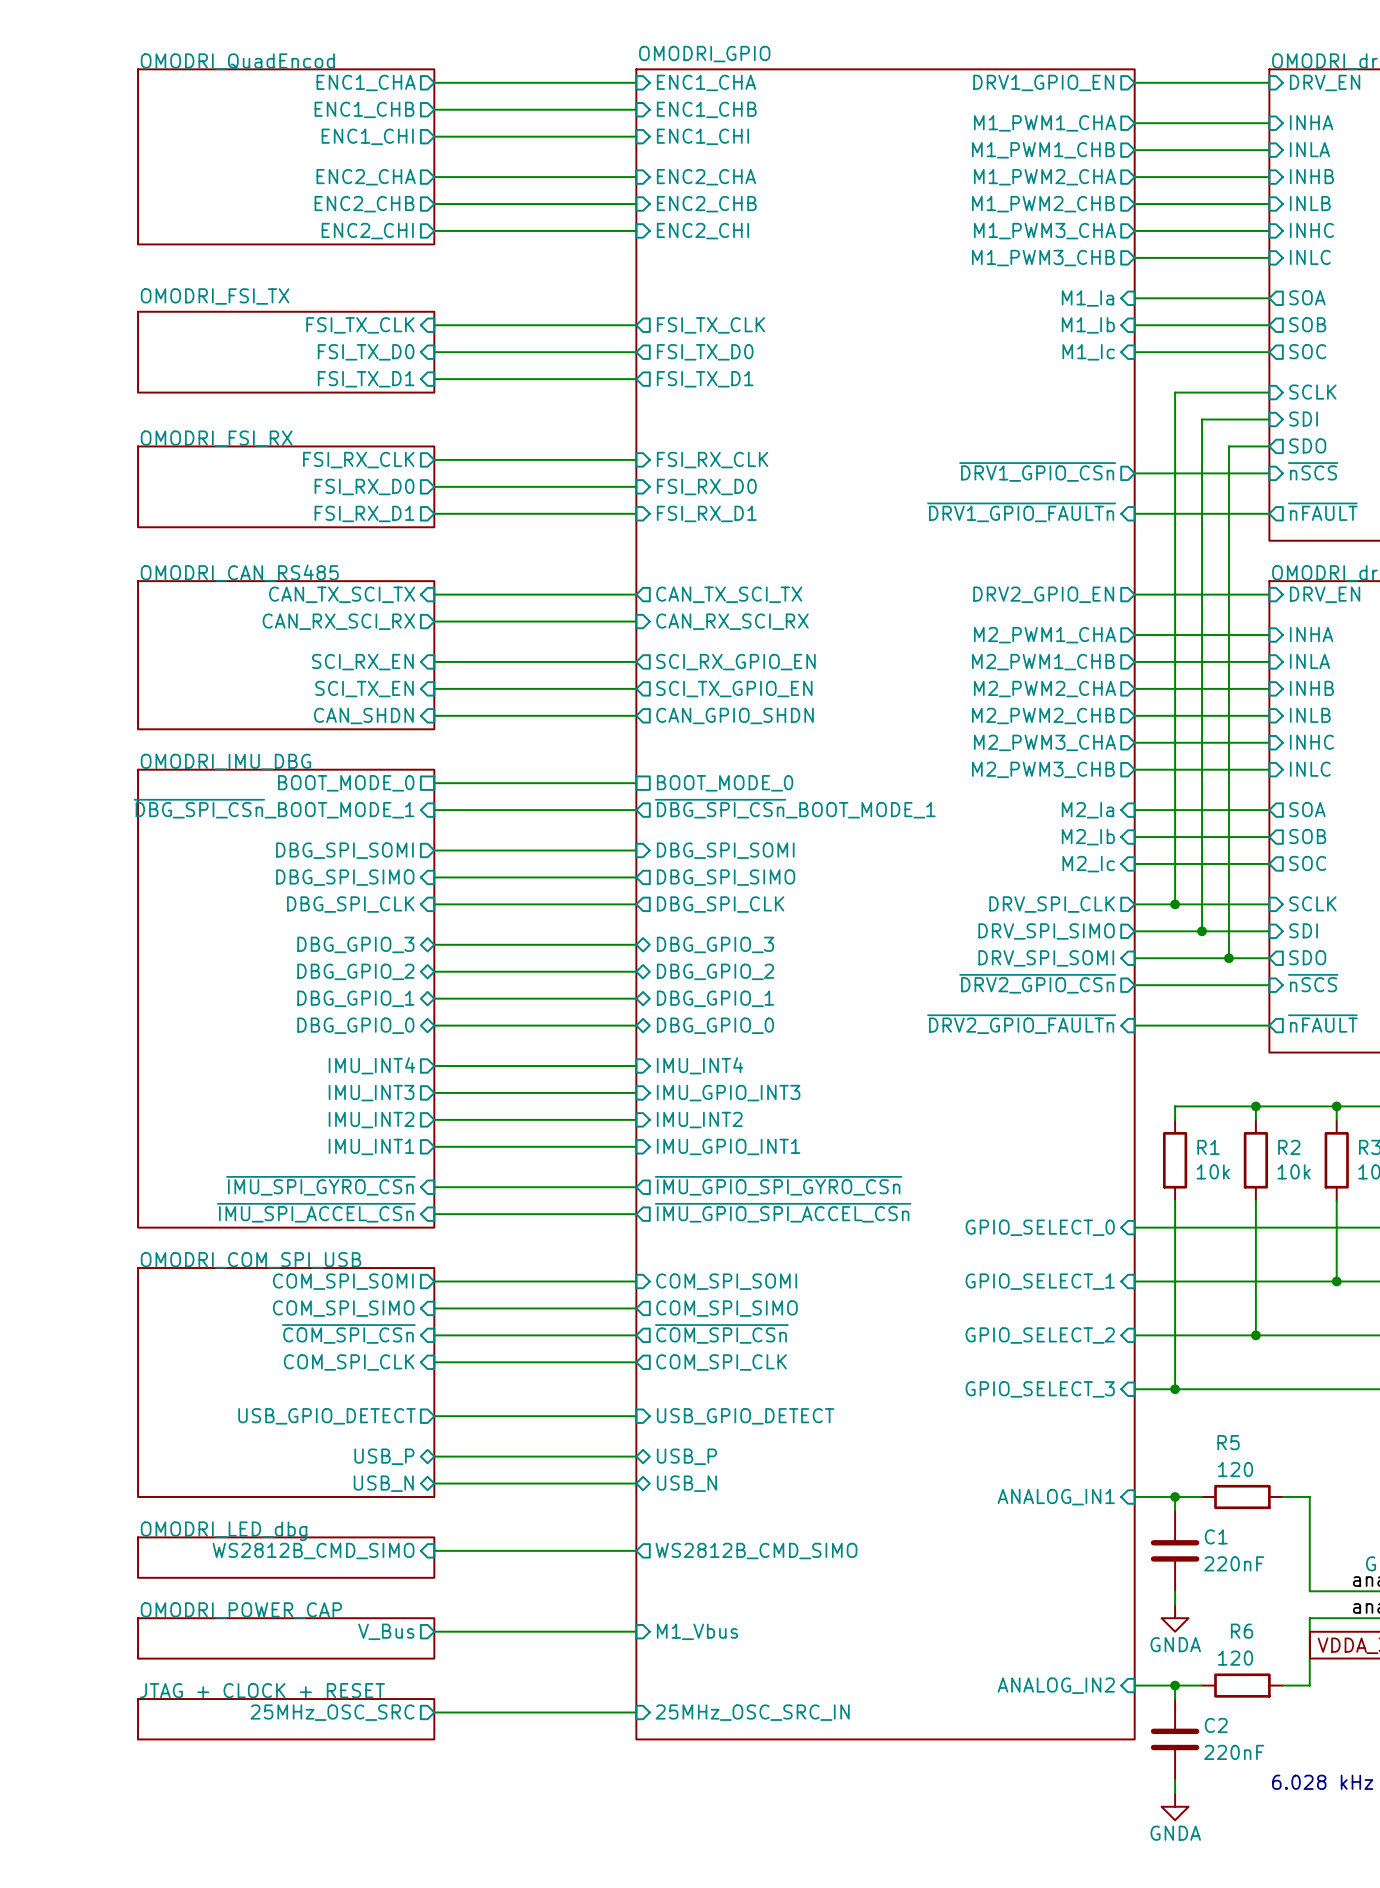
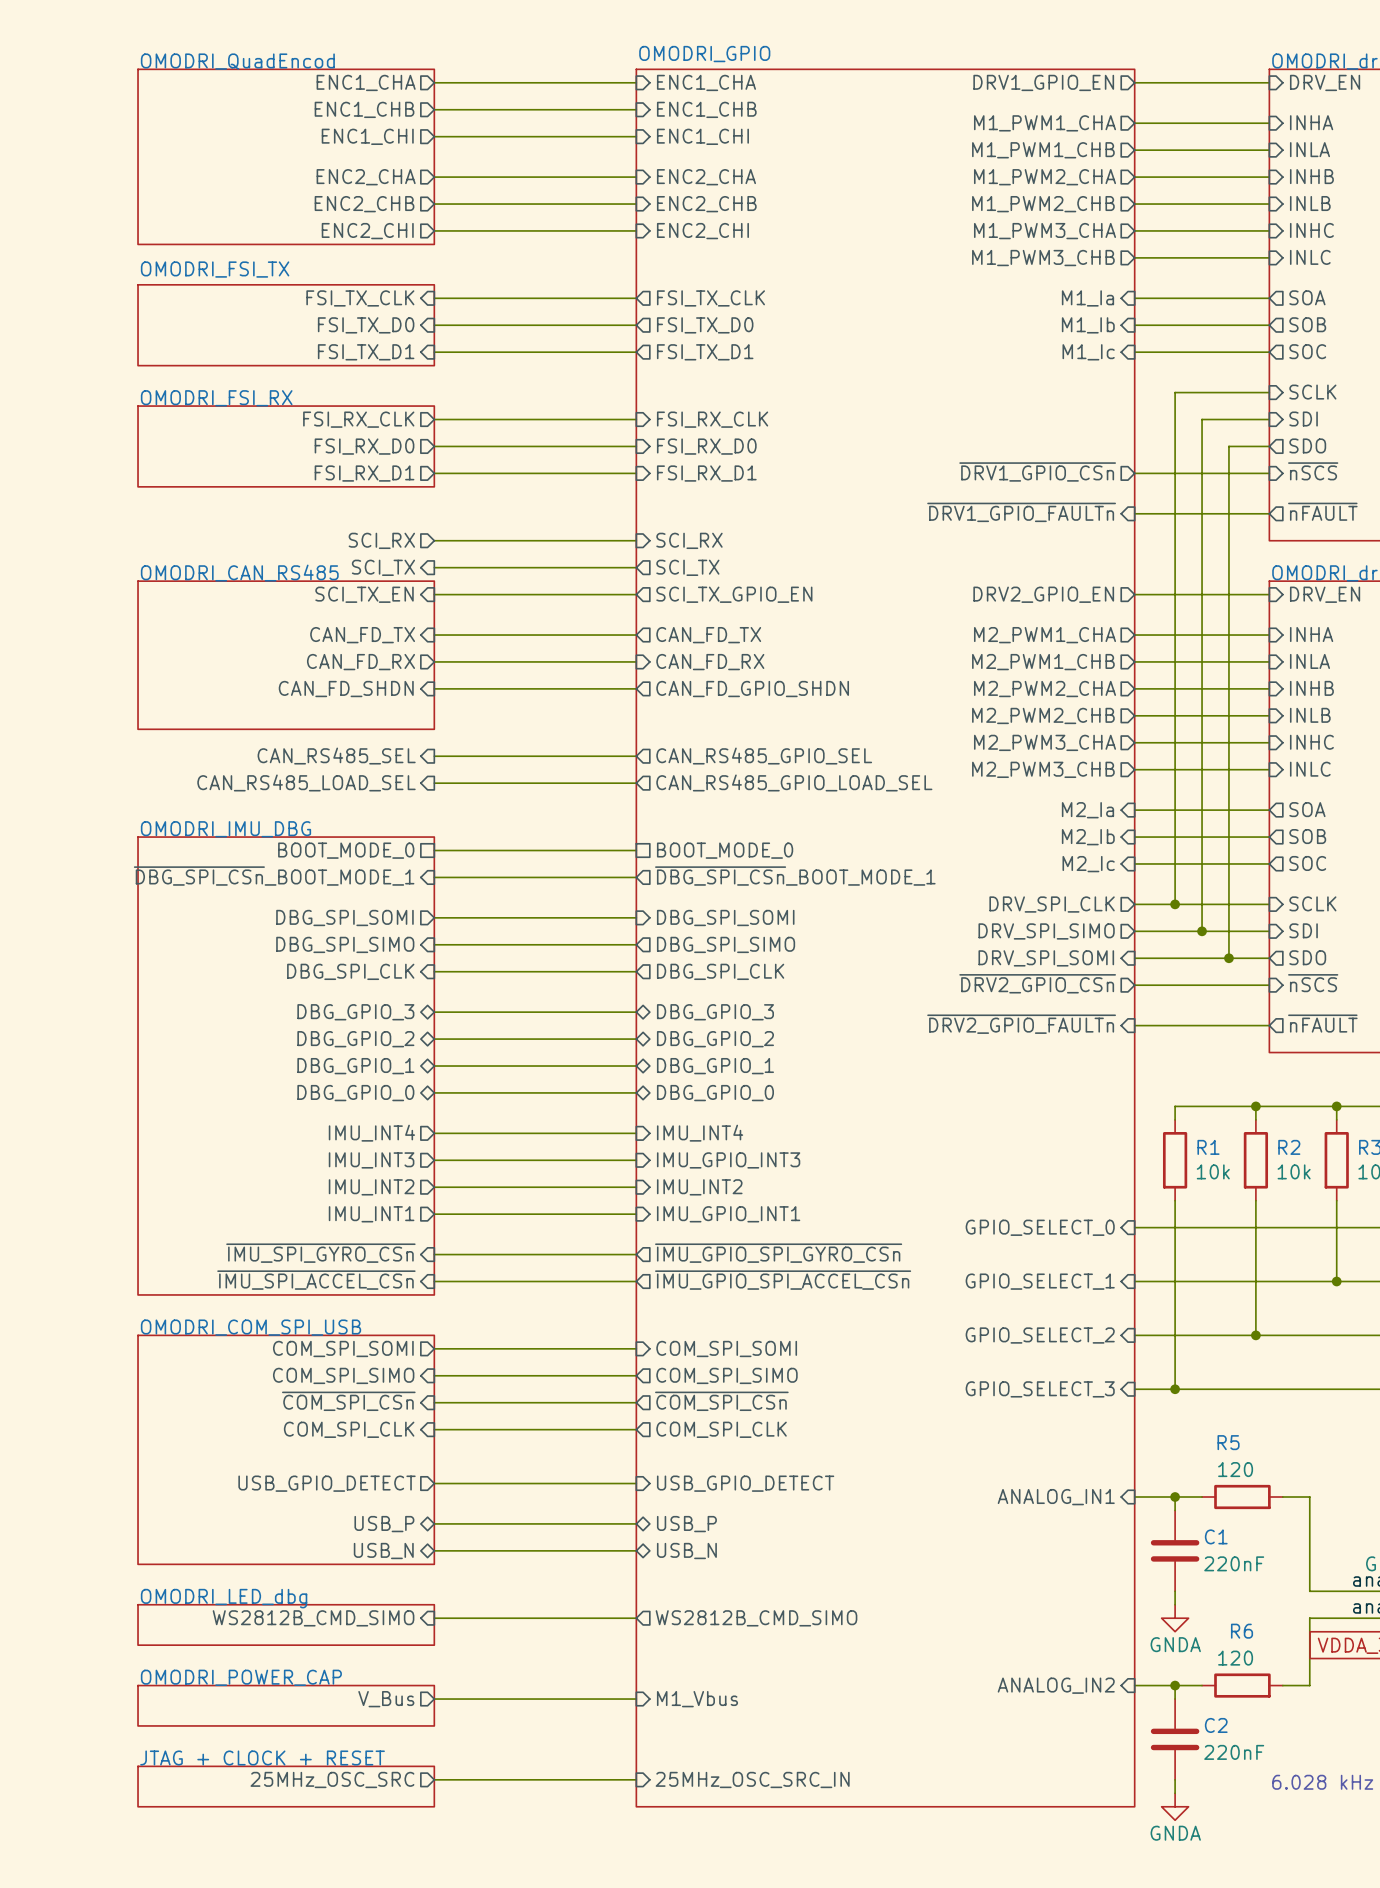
sheet pin: none -> FSI_TX_CLK (360, 298)
wire: none -> (434, 298) (636, 298)
sheet pin: none -> FSI_TX_CLK (710, 298)
sheet pin: FSI_TX_CLK (360, 325) -> FSI_TX_D0 (366, 325)
sheet pin: FSI_TX_CLK (710, 325) -> FSI_TX_D0 (705, 325)
sheet OMODRI_FSI_TX position: (286, 352) -> (286, 325)
sheet pin: FSI_TX_D0 (366, 352) -> FSI_TX_D1 (366, 352)
sheet pin: FSI_TX_D0 (705, 352) -> FSI_TX_D1 (705, 352)
sheet pin: FSI_TX_D1 (366, 379) -> none
wire: (434, 379) (636, 379) -> (434, 419) (636, 419)
sheet pin: FSI_TX_D1 (705, 379) -> none
wire: (434, 459) (636, 459) -> (434, 473) (636, 473)
sheet pin position: FSI_RX_CLK (358, 460) -> FSI_RX_CLK (358, 419)
sheet pin position: FSI_RX_CLK (712, 460) -> FSI_RX_CLK (712, 419)
sheet OMODRI_FSI_RX position: (286, 486) -> (286, 446)
wire: (434, 486) (636, 486) -> (434, 446) (636, 446)
sheet pin position: FSI_RX_D0 (364, 487) -> FSI_RX_D0 (364, 446)
sheet pin position: FSI_RX_D0 (706, 487) -> FSI_RX_D0 (706, 446)
sheet pin position: FSI_RX_D1 (364, 513) -> FSI_RX_D1 (364, 473)
wire: (434, 513) (636, 513) -> (434, 540) (636, 540)
sheet pin position: FSI_RX_D1 (706, 513) -> FSI_RX_D1 (706, 473)
sheet pin: none -> SCI_RX (381, 540)
sheet pin: none -> SCI_RX (689, 540)
sheet pin: none -> SCI_TX (383, 567)
sheet pin: none -> SCI_TX (687, 567)
sheet pin: CAN_TX_SCI_TX (342, 594) -> SCI_TX_EN (364, 594)
sheet pin: CAN_TX_SCI_TX (729, 594) -> SCI_TX_GPIO_EN (734, 594)
sheet pin: CAN_RX_SCI_RX (338, 621) -> none
wire: (434, 621) (636, 621) -> (434, 635) (636, 635)
sheet pin: CAN_RX_SCI_RX (732, 621) -> none
sheet pin: none -> CAN_FD_TX (362, 635)
sheet pin: none -> CAN_FD_TX (708, 635)
sheet pin shape: input (362, 662) -> output (361, 662)
sheet pin: SCI_RX_EN (362, 662) -> CAN_FD_RX (361, 662)
sheet pin shape: output (735, 662) -> input (710, 662)
sheet pin: SCI_RX_GPIO_EN (735, 662) -> CAN_FD_RX (710, 662)
sheet pin: SCI_TX_EN (364, 689) -> CAN_FD_SHDN (346, 689)
sheet pin: SCI_TX_GPIO_EN (734, 689) -> CAN_FD_GPIO_SHDN (752, 689)
sheet pin: CAN_SHDN (363, 715) -> none
wire: (434, 715) (636, 715) -> (434, 756) (636, 756)
sheet pin: CAN_GPIO_SHDN (735, 715) -> none
sheet pin: none -> CAN_RS485_SEL (336, 756)
sheet pin: none -> CAN_RS485_GPIO_SEL (764, 756)
sheet pin shape: passive (346, 783) -> input (306, 782)
sheet pin: BOOT_MODE_0 (346, 783) -> CAN_RS485_LOAD_SEL (306, 782)
sheet pin shape: passive (725, 783) -> output (794, 782)
sheet pin: BOOT_MODE_0 (725, 783) -> CAN_RS485_GPIO_LOAD_SEL (794, 782)
sheet pin: ~{DBG_SPI_CSn}_BOOT_MODE_1 (274, 808) -> none
sheet pin: ~{DBG_SPI_CSn}_BOOT_MODE_1 (795, 808) -> none
wire: (434, 810) (636, 810) -> (434, 567) (636, 567)
sheet pin shape: output (344, 850) -> passive (346, 850)
sheet pin: DBG_SPI_SOMI (344, 850) -> BOOT_MODE_0 (346, 850)
sheet pin shape: input (725, 850) -> passive (725, 850)
sheet pin: DBG_SPI_SOMI (725, 850) -> BOOT_MODE_0 (725, 850)
sheet pin: DBG_SPI_SIMO (345, 877) -> ~{DBG_SPI_CSn}_BOOT_MODE_1 (274, 876)
sheet pin: DBG_SPI_SIMO (726, 877) -> ~{DBG_SPI_CSn}_BOOT_MODE_1 (795, 876)
sheet pin shape: input (350, 904) -> output (344, 917)
sheet pin: DBG_SPI_CLK (350, 904) -> DBG_SPI_SOMI (344, 917)
wire: (434, 904) (636, 904) -> (434, 917) (636, 917)
sheet pin shape: output (720, 904) -> input (725, 917)
sheet pin: DBG_SPI_CLK (720, 904) -> DBG_SPI_SOMI (725, 917)
sheet OMODRI_GPIO: (885, 904) -> none
sheet OMODRI_GPIO: none -> (885, 938)
sheet pin shape: bidirectional (355, 944) -> input (345, 944)
sheet pin: DBG_GPIO_3 (355, 944) -> DBG_SPI_SIMO (345, 944)
sheet pin shape: bidirectional (715, 944) -> output (726, 944)
sheet pin: DBG_GPIO_3 (715, 944) -> DBG_SPI_SIMO (726, 944)
sheet pin shape: bidirectional (355, 971) -> input (350, 971)
sheet pin: DBG_GPIO_2 (355, 971) -> DBG_SPI_CLK (350, 971)
sheet pin shape: bidirectional (715, 971) -> output (720, 971)
sheet pin: DBG_GPIO_2 (715, 971) -> DBG_SPI_CLK (720, 971)
sheet OMODRI_IMU_DBG position: (286, 998) -> (286, 1066)
sheet pin: DBG_GPIO_1 (355, 998) -> none
wire: (434, 998) (636, 998) -> (434, 1012) (636, 1012)
sheet pin: DBG_GPIO_1 (715, 998) -> none
sheet pin: none -> DBG_GPIO_3 (355, 1012)
sheet pin: none -> DBG_GPIO_3 (715, 1012)
sheet pin: DBG_GPIO_0 (355, 1025) -> none
wire: (434, 1025) (636, 1025) -> (434, 1039) (636, 1039)
sheet pin: DBG_GPIO_0 (715, 1025) -> none
sheet pin: none -> DBG_GPIO_2 (355, 1039)
sheet pin: none -> DBG_GPIO_2 (715, 1039)
sheet pin shape: output (371, 1065) -> bidirectional (355, 1066)
sheet pin: IMU_INT4 (371, 1065) -> DBG_GPIO_1 (355, 1066)
sheet pin shape: input (700, 1065) -> bidirectional (715, 1066)
sheet pin: IMU_INT4 (700, 1065) -> DBG_GPIO_1 (715, 1066)
sheet pin shape: output (371, 1093) -> bidirectional (355, 1093)
sheet pin: IMU_INT3 (371, 1093) -> DBG_GPIO_0 (355, 1093)
sheet pin shape: input (728, 1093) -> bidirectional (715, 1093)
sheet pin: IMU_GPIO_INT3 (728, 1093) -> DBG_GPIO_0 (715, 1093)
wire: (434, 1119) (636, 1119) -> (434, 1133) (636, 1133)
sheet pin: IMU_INT2 (371, 1120) -> none
sheet pin: IMU_INT2 (699, 1120) -> none
sheet pin: none -> IMU_INT4 (371, 1133)
sheet pin: none -> IMU_INT4 (700, 1133)
sheet pin: IMU_INT1 (371, 1146) -> none
wire: (434, 1146) (636, 1146) -> (434, 1160) (636, 1160)
sheet pin: IMU_GPIO_INT1 (728, 1146) -> none
sheet pin: none -> IMU_INT3 (371, 1160)
sheet pin: none -> IMU_GPIO_INT3 (728, 1160)
sheet pin shape: input (320, 1185) -> output (371, 1187)
sheet pin: ~{IMU_SPI_GYRO_CSn} (320, 1185) -> IMU_INT2 (371, 1187)
sheet pin shape: output (778, 1185) -> input (699, 1187)
sheet pin: ~{IMU_GPIO_SPI_GYRO_CSn} (778, 1185) -> IMU_INT2 (699, 1187)
sheet pin shape: input (316, 1212) -> output (371, 1214)
sheet pin: ~{IMU_SPI_ACCEL_CSn} (316, 1212) -> IMU_INT1 (371, 1214)
sheet pin shape: output (783, 1212) -> input (728, 1214)
sheet pin: ~{IMU_GPIO_SPI_ACCEL_CSn} (783, 1212) -> IMU_GPIO_INT1 (728, 1214)
sheet pin: none -> ~{IMU_SPI_GYRO_CSn} (320, 1253)
sheet pin: none -> ~{IMU_GPIO_SPI_GYRO_CSn} (778, 1253)
sheet pin shape: output (343, 1281) -> input (316, 1280)
sheet pin: COM_SPI_SOMI (343, 1281) -> ~{IMU_SPI_ACCEL_CSn} (316, 1280)
sheet pin shape: input (726, 1281) -> output (783, 1280)
sheet pin: COM_SPI_SOMI (726, 1281) -> ~{IMU_GPIO_SPI_ACCEL_CSn} (783, 1280)
sheet pin position: COM_SPI_SIMO (343, 1308) -> COM_SPI_SIMO (343, 1375)
wire: (434, 1308) (636, 1308) -> (434, 1254) (636, 1254)
sheet pin position: COM_SPI_SIMO (726, 1308) -> COM_SPI_SIMO (726, 1375)
sheet pin position: ~{COM_SPI_CSn} (348, 1333) -> ~{COM_SPI_CSn} (348, 1401)
sheet pin position: ~{COM_SPI_CSn} (721, 1333) -> ~{COM_SPI_CSn} (721, 1401)
wire: (434, 1335) (636, 1335) -> (434, 1348) (636, 1348)
sheet pin: none -> COM_SPI_SOMI (343, 1348)
sheet pin: none -> COM_SPI_SOMI (726, 1348)
sheet pin position: COM_SPI_CLK (349, 1362) -> COM_SPI_CLK (349, 1429)
wire: (434, 1362) (636, 1362) -> (434, 1375) (636, 1375)
sheet pin position: COM_SPI_CLK (721, 1362) -> COM_SPI_CLK (721, 1429)
sheet OMODRI_COM_SPI_USB position: (286, 1382) -> (286, 1449)
wire: none -> (434, 1402) (636, 1402)
sheet pin: USB_GPIO_DETECT (327, 1416) -> none
wire: (434, 1416) (636, 1416) -> (434, 1429) (636, 1429)
sheet pin: USB_GPIO_DETECT (745, 1416) -> none
sheet pin position: USB_P (384, 1456) -> USB_P (384, 1524)
wire: (434, 1456) (636, 1456) -> (434, 1523) (636, 1523)
sheet pin position: USB_P (686, 1456) -> USB_P (686, 1524)
sheet pin shape: bidirectional (383, 1483) -> output (327, 1483)
sheet pin: USB_N (383, 1483) -> USB_GPIO_DETECT (327, 1483)
sheet pin shape: bidirectional (686, 1483) -> input (745, 1483)
sheet pin: USB_N (686, 1483) -> USB_GPIO_DETECT (745, 1483)
sheet pin shape: input (313, 1551) -> bidirectional (383, 1551)
sheet pin: WS2812B_CMD_SIMO (313, 1551) -> USB_N (383, 1551)
sheet pin shape: output (756, 1551) -> bidirectional (686, 1551)
sheet pin: WS2812B_CMD_SIMO (756, 1551) -> USB_N (686, 1551)
sheet OMODRI_LED_dbg position: (286, 1557) -> (286, 1624)
sheet pin: none -> WS2812B_CMD_SIMO (313, 1618)
sheet pin: none -> WS2812B_CMD_SIMO (756, 1618)
sheet pin position: V_Bus (386, 1631) -> V_Bus (386, 1699)
wire: (434, 1631) (636, 1631) -> (434, 1618) (636, 1618)
sheet pin position: M1_Vbus (697, 1631) -> M1_Vbus (697, 1699)
sheet OMODRI_POWER_CAP position: (286, 1638) -> (286, 1705)
sheet pin position: 25MHz_OSC_SRC (332, 1712) -> 25MHz_OSC_SRC (332, 1779)
wire: (434, 1712) (636, 1712) -> (434, 1699) (636, 1699)
sheet pin position: 25MHz_OSC_SRC_IN (752, 1712) -> 25MHz_OSC_SRC_IN (752, 1779)
sheet JTAG + CLOCK + RESET position: (286, 1719) -> (286, 1786)
wire: none -> (434, 1779) (636, 1779)

